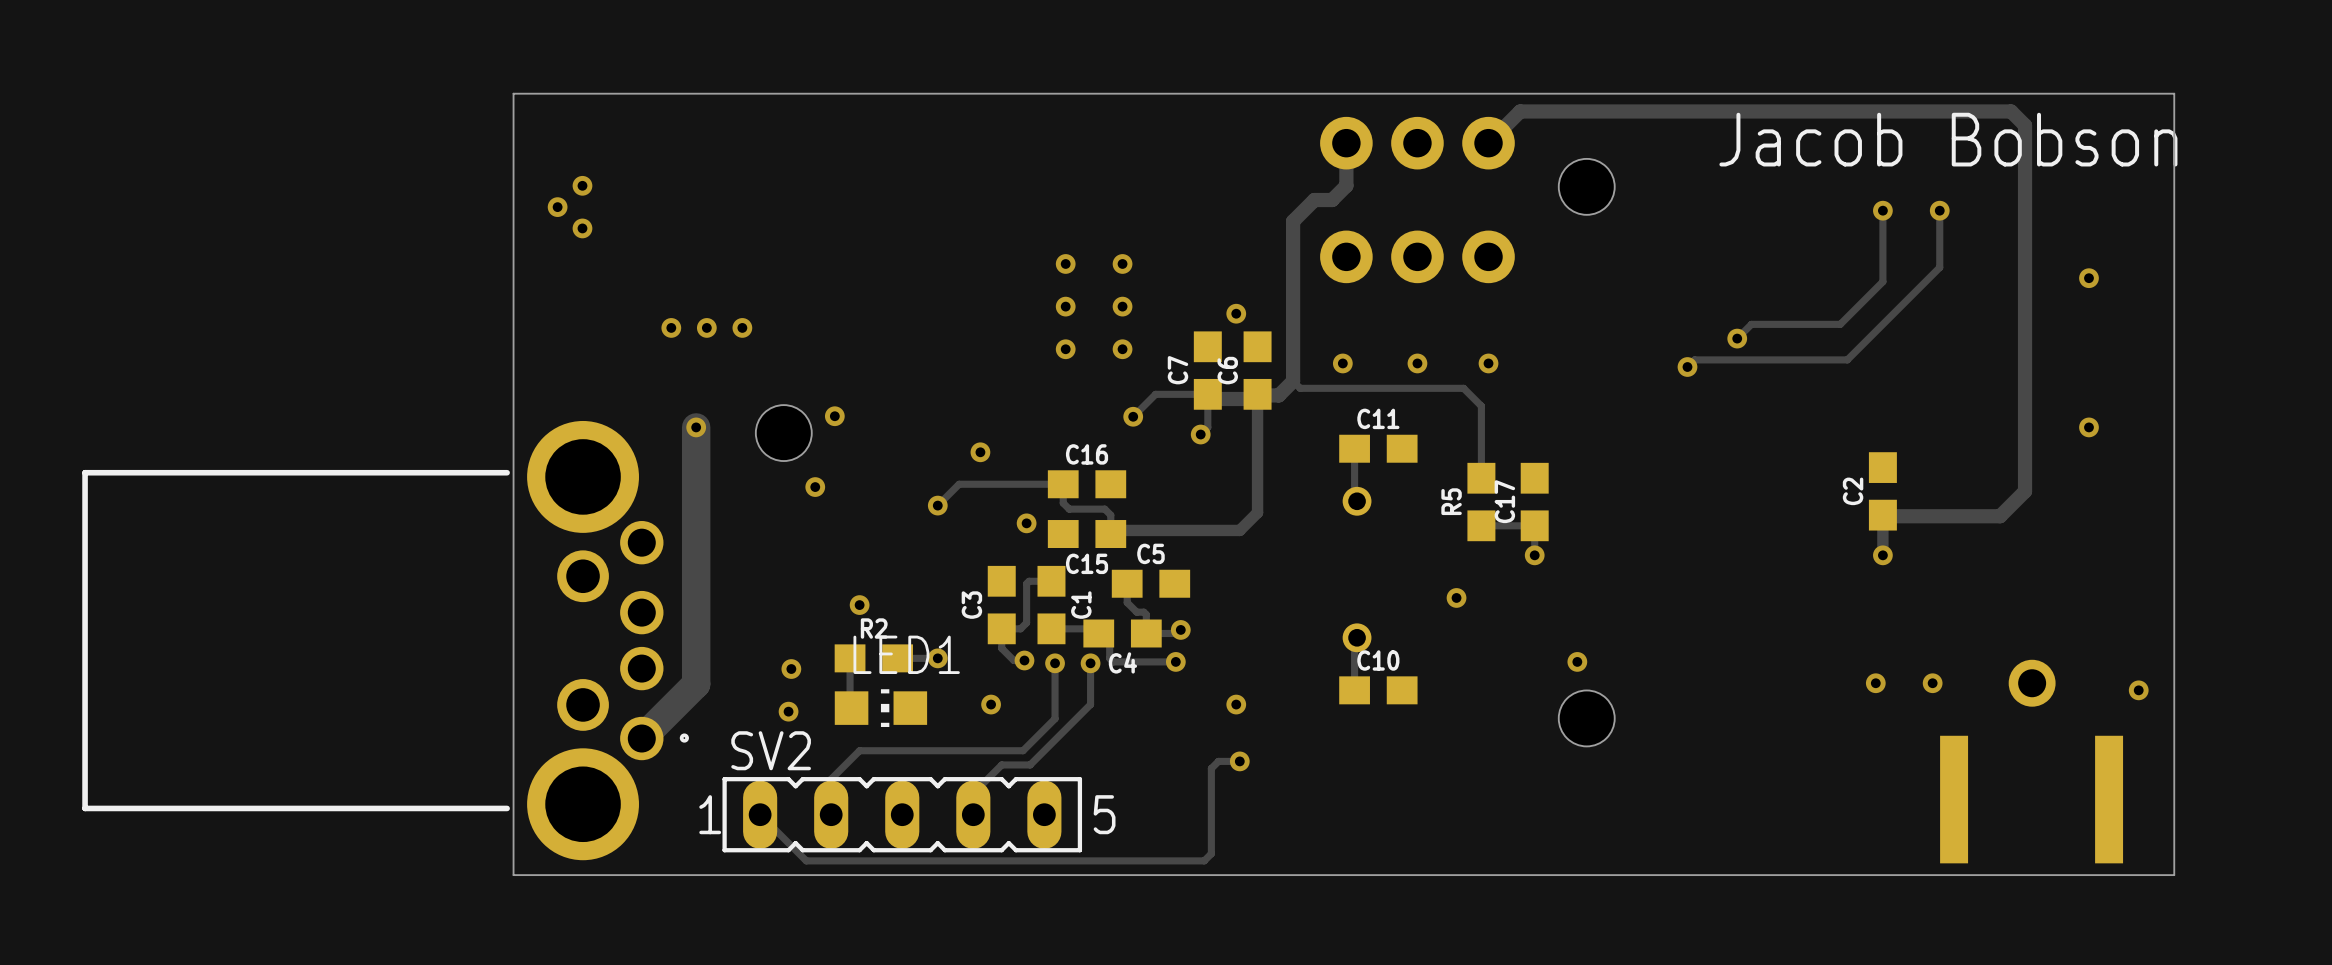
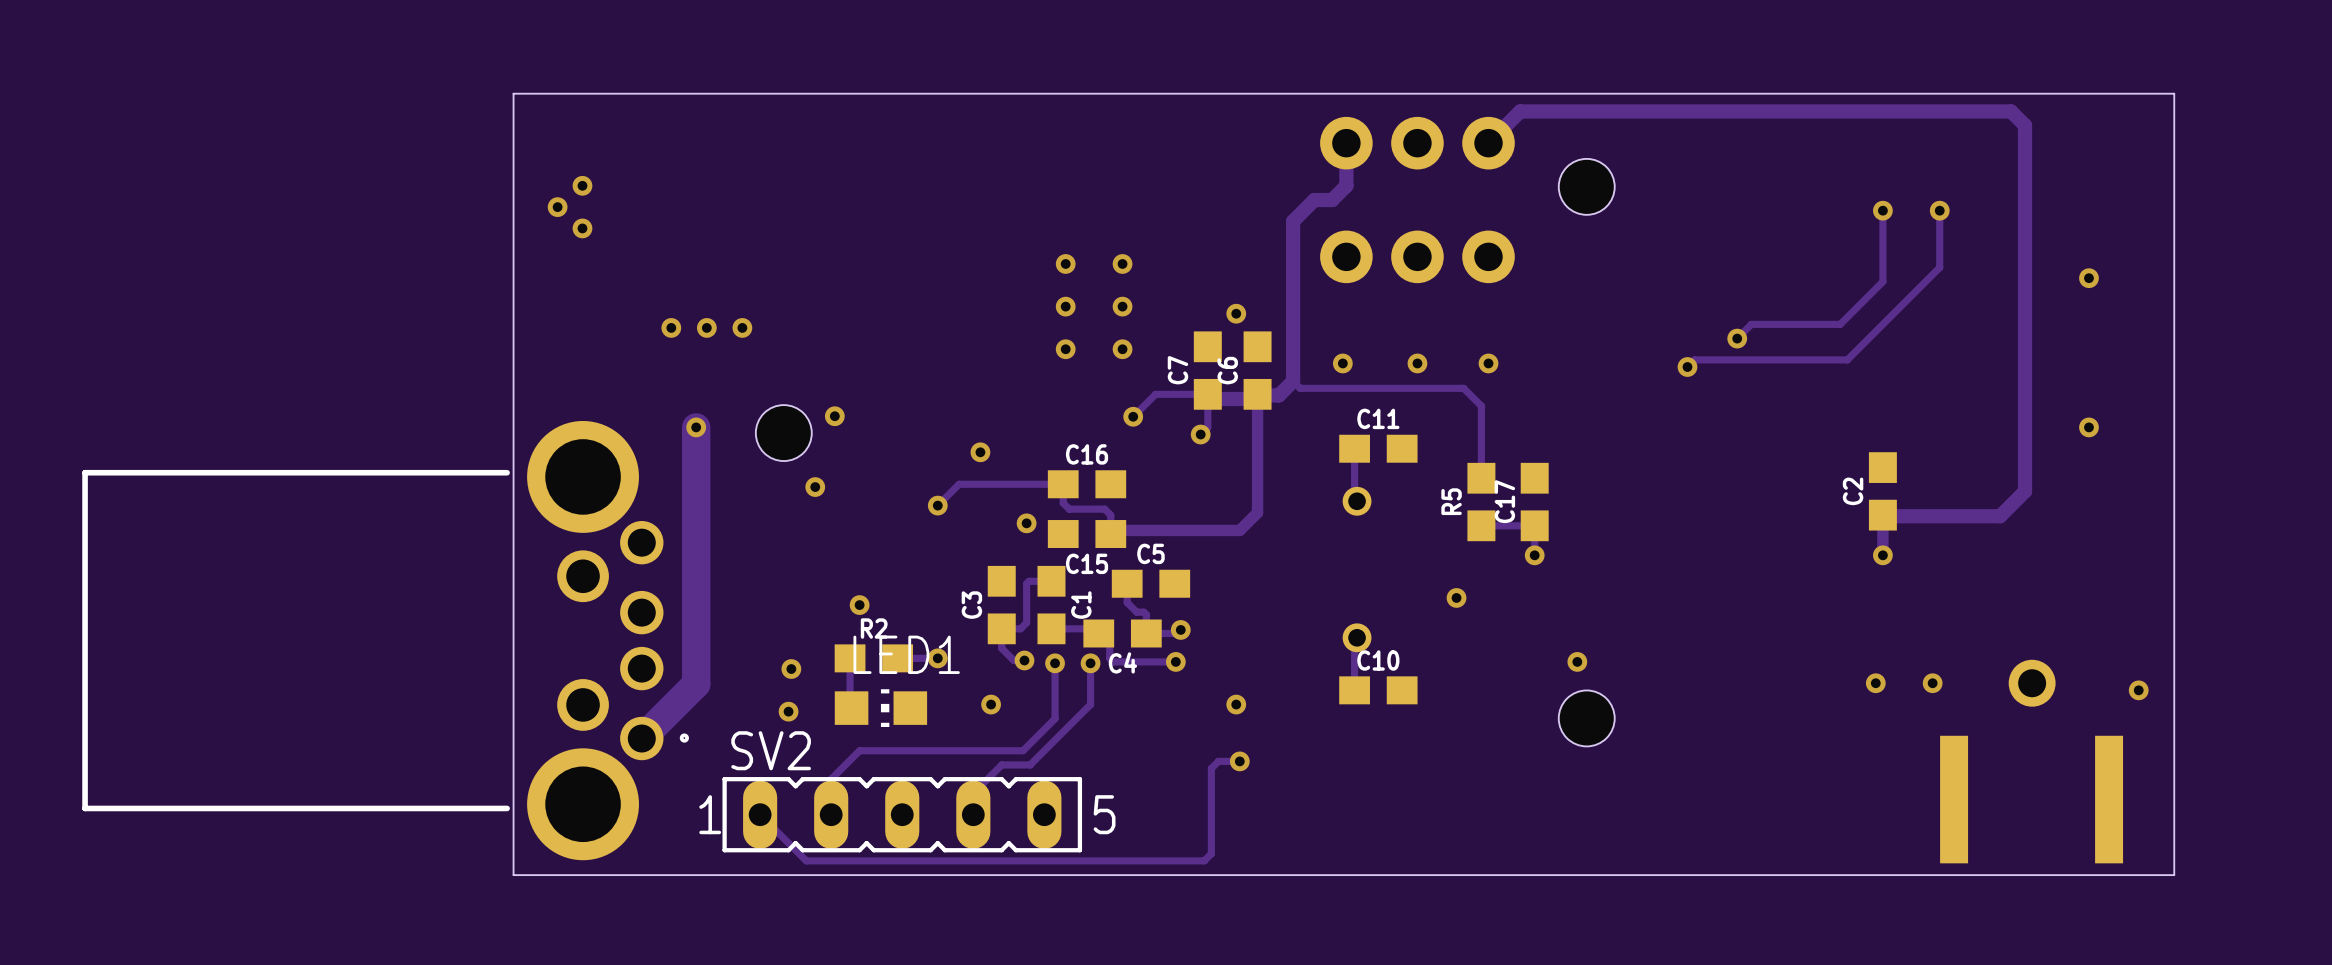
text: Jacob Bobson (1948, 139) -> none

